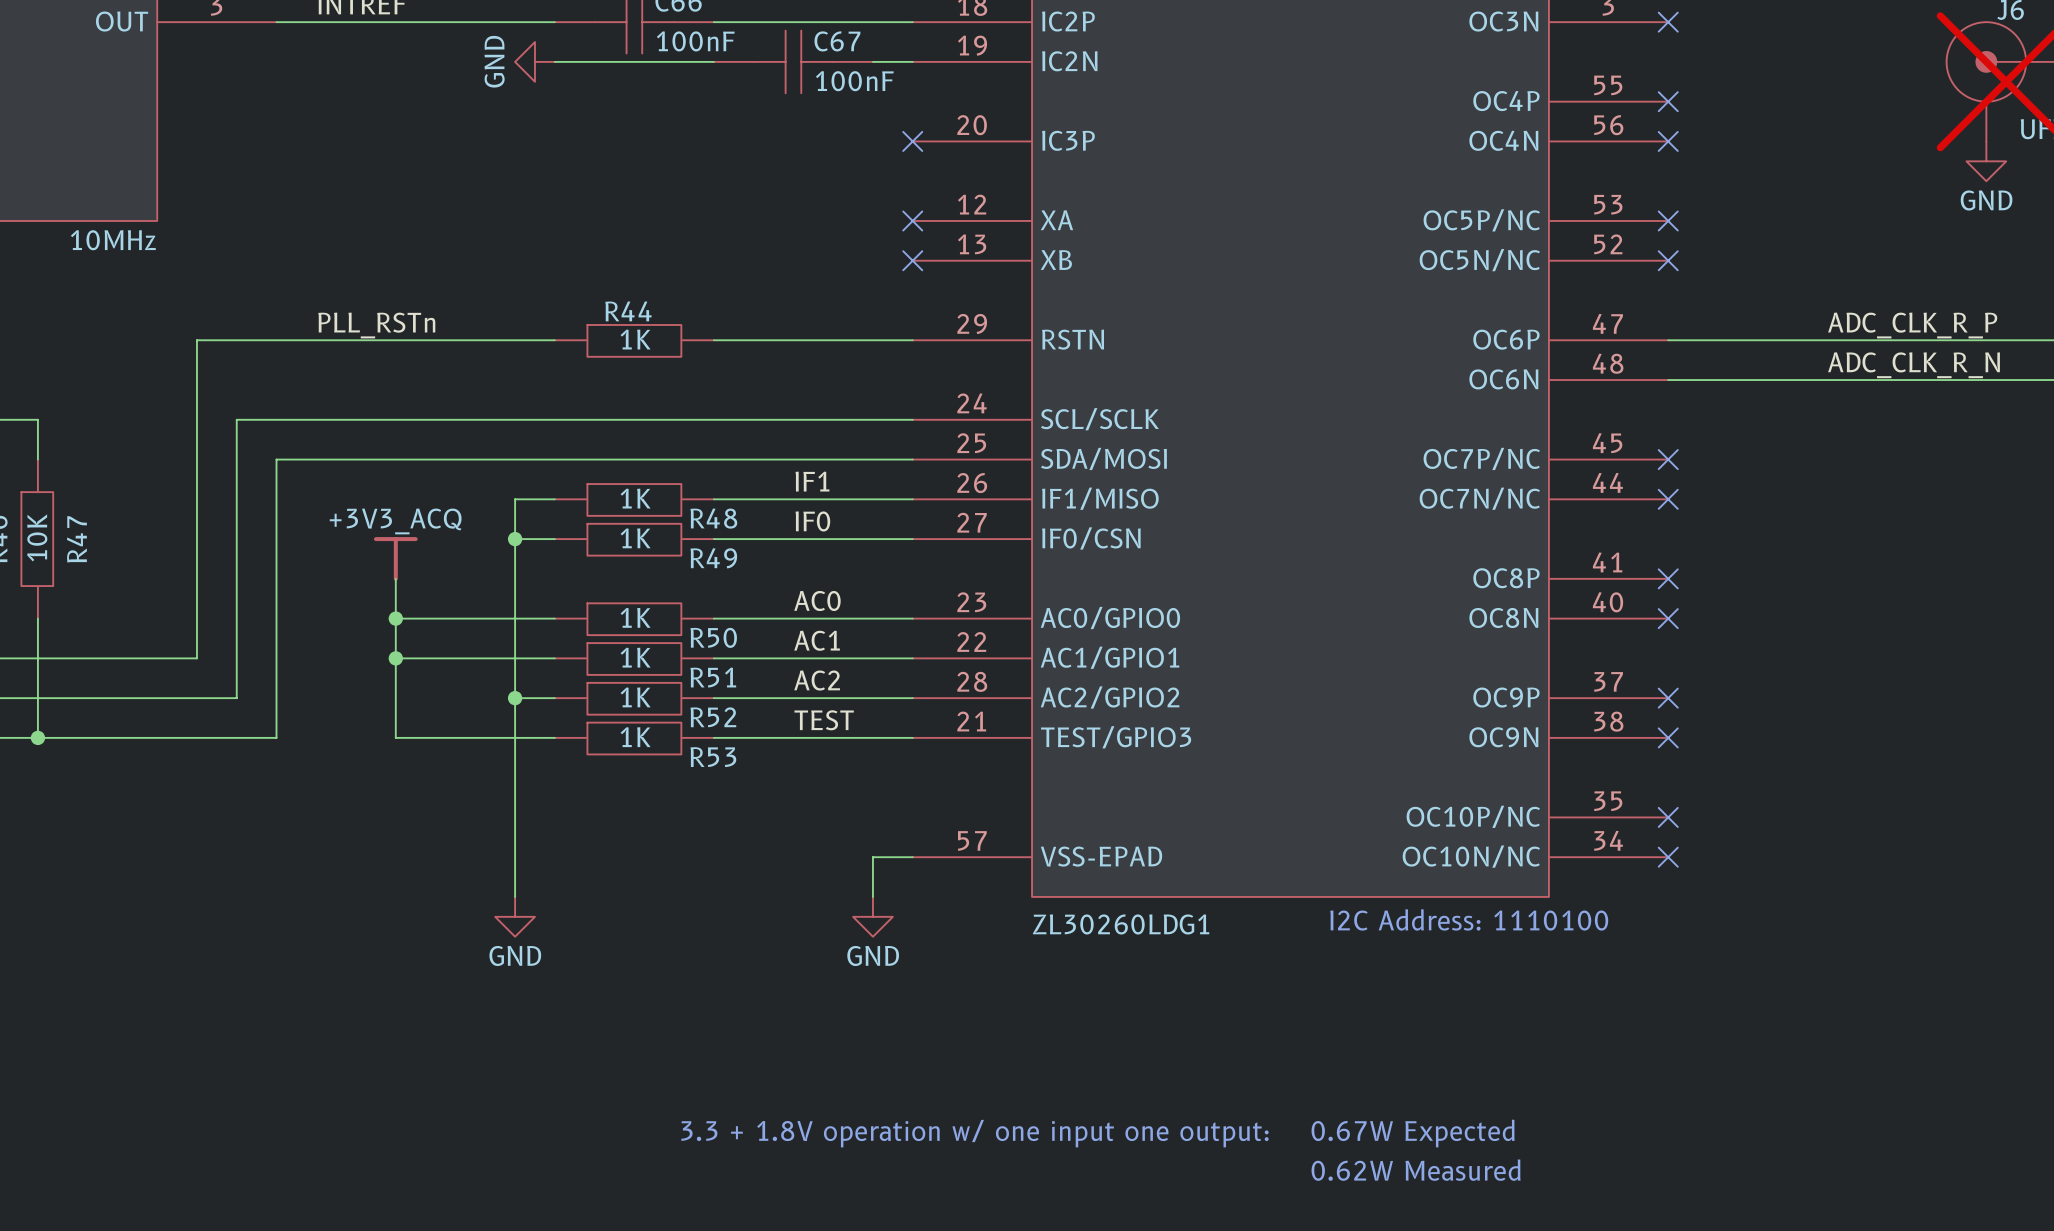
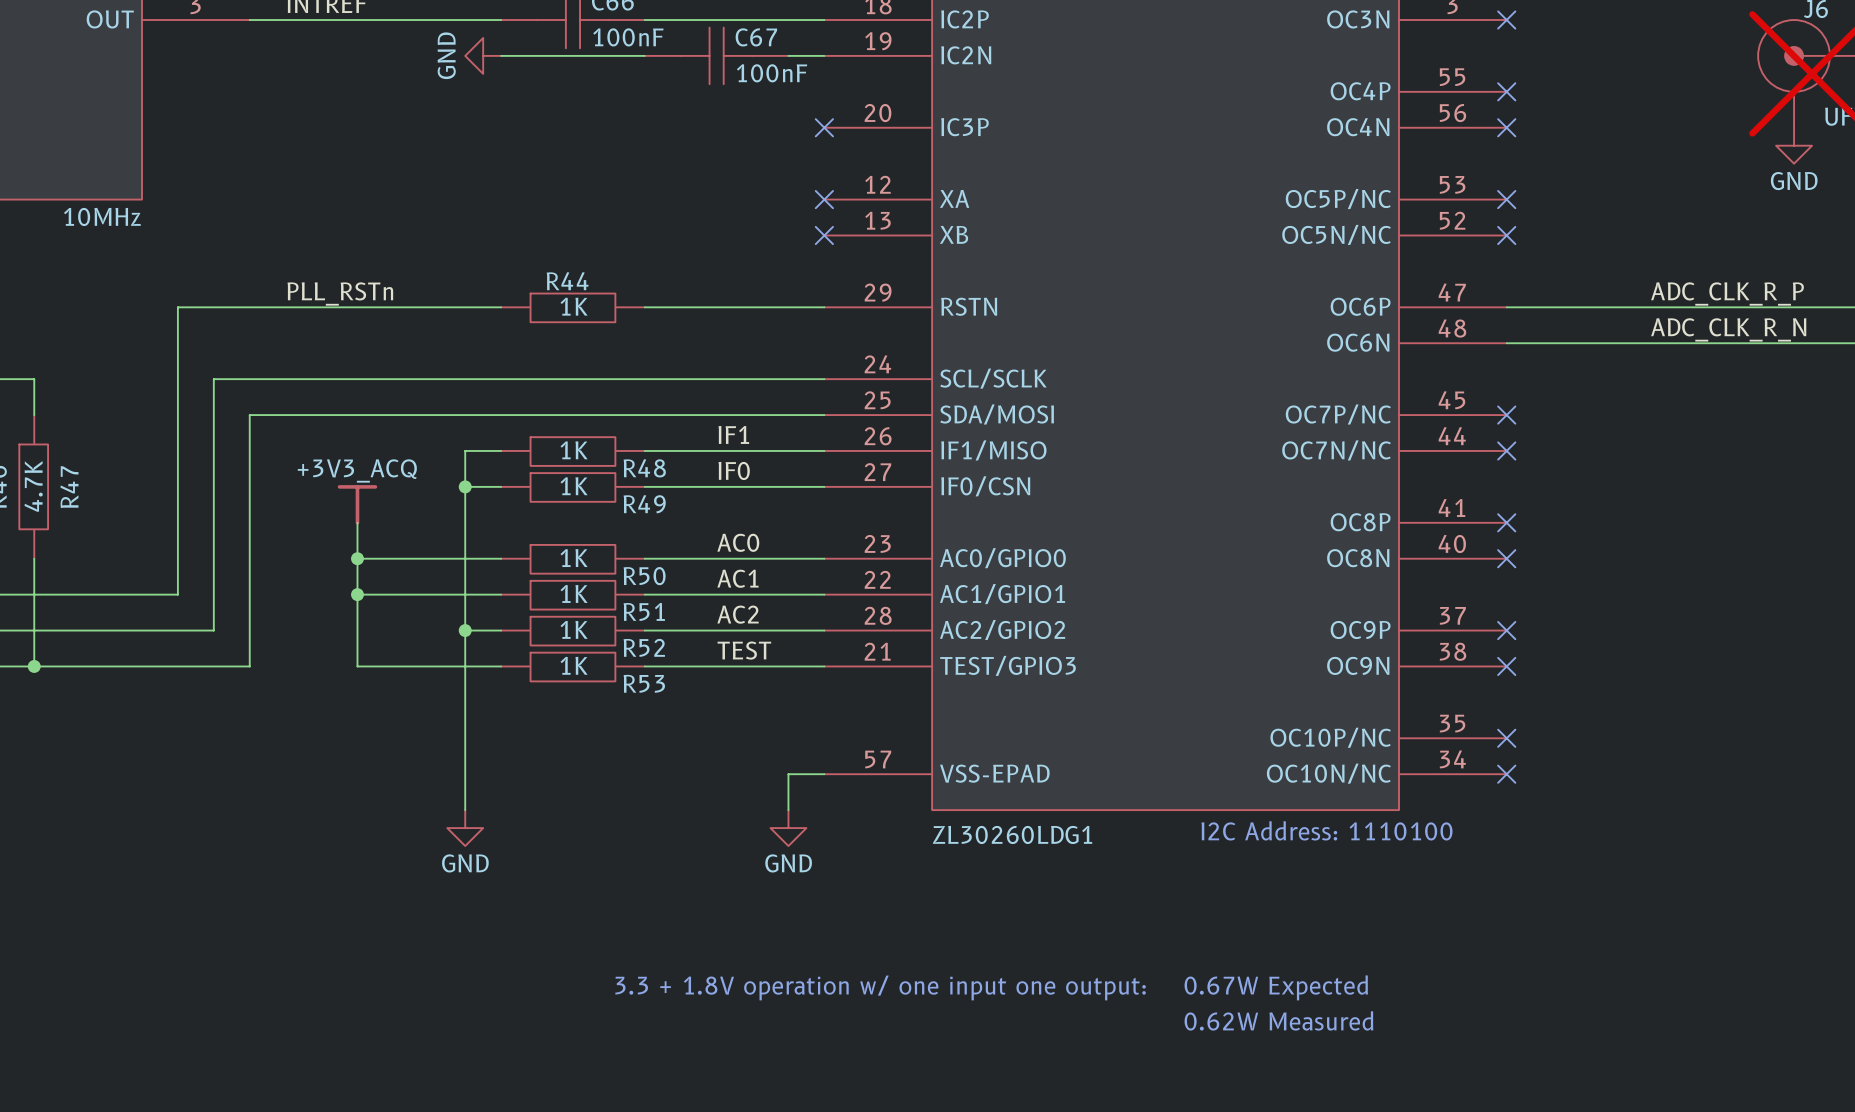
R47 value: 10K (37, 537) -> 4.7K (33, 486)
text: none -> 0.67W Expected (1276, 987)
text position: 3.3 + 1.8V operation w/ one input one output: (974, 1133) -> 3.3 + 1.8V operation w/ one input one output: (880, 987)
text: 0.67W Expected (1413, 1133) -> 0.62W Measured (1278, 1020)
text: 0.62W Measured (1416, 1170) -> none

